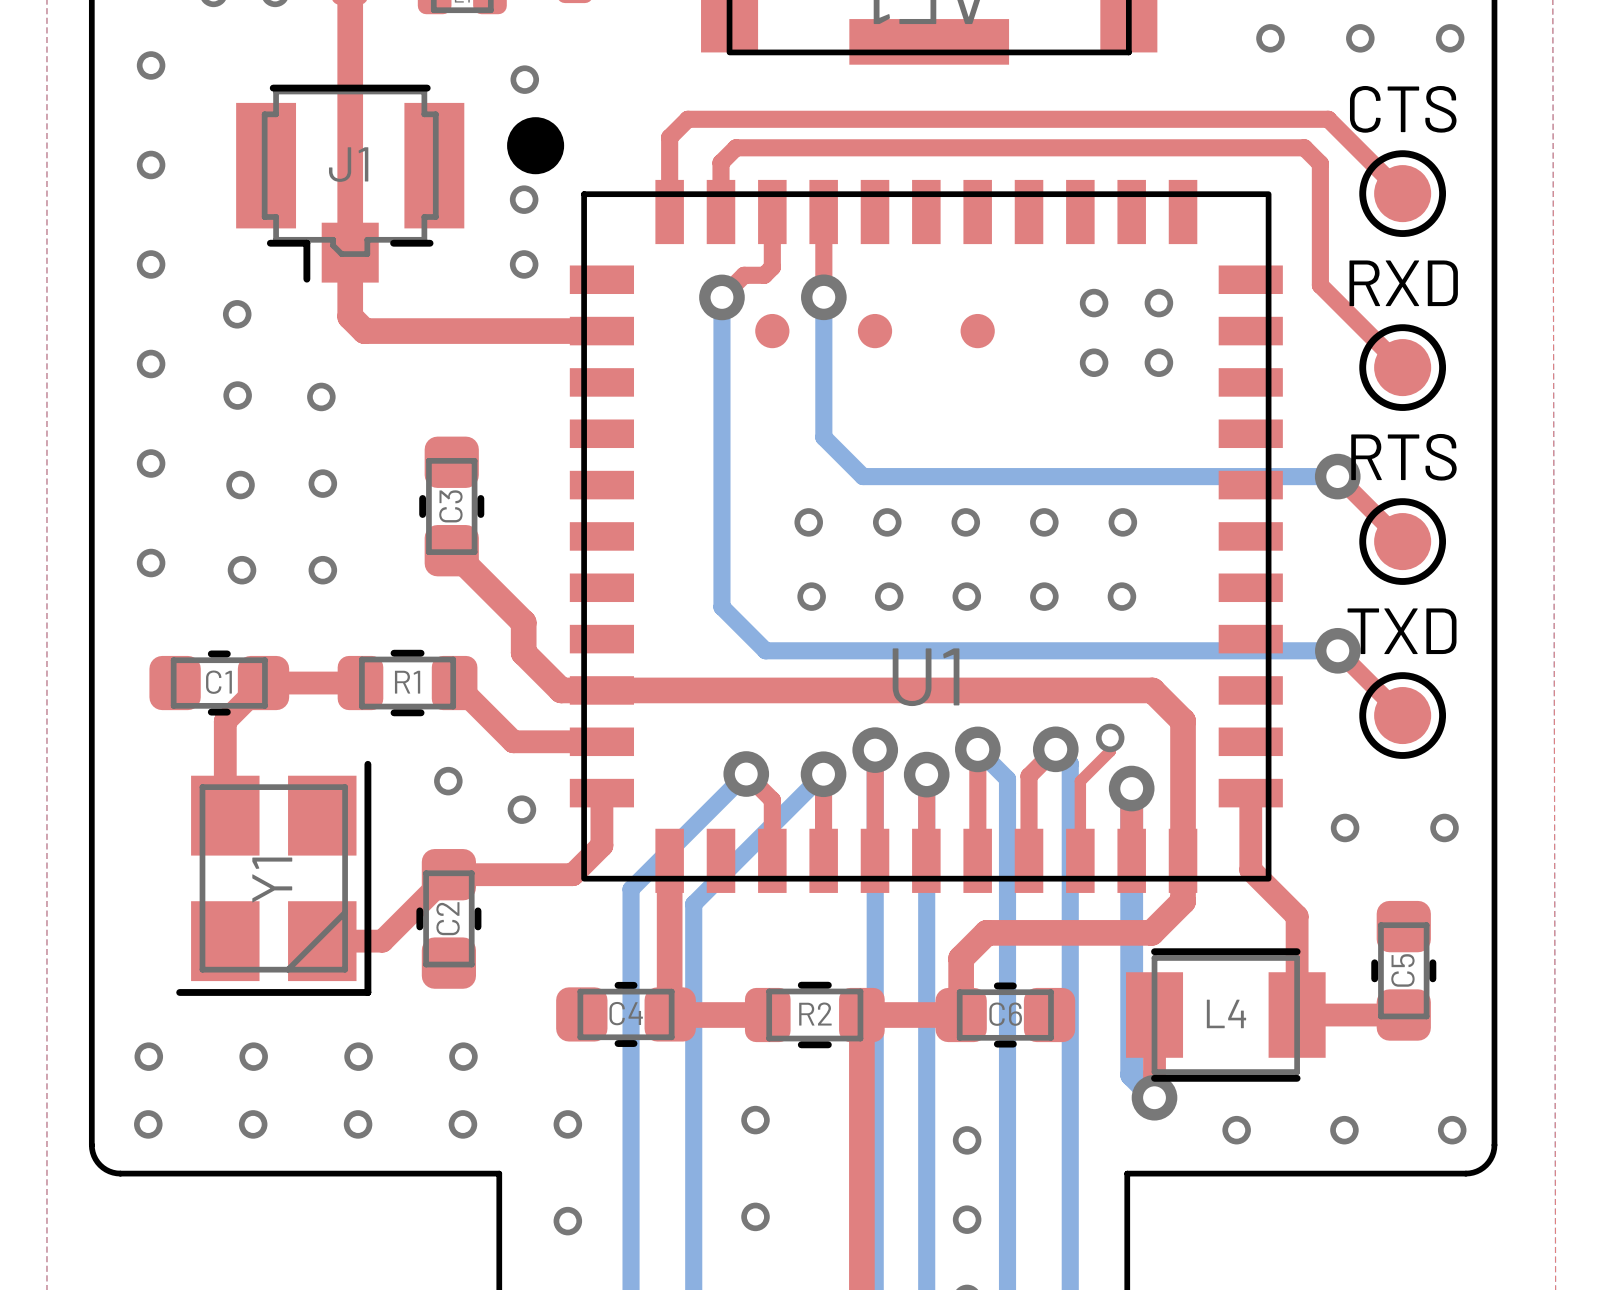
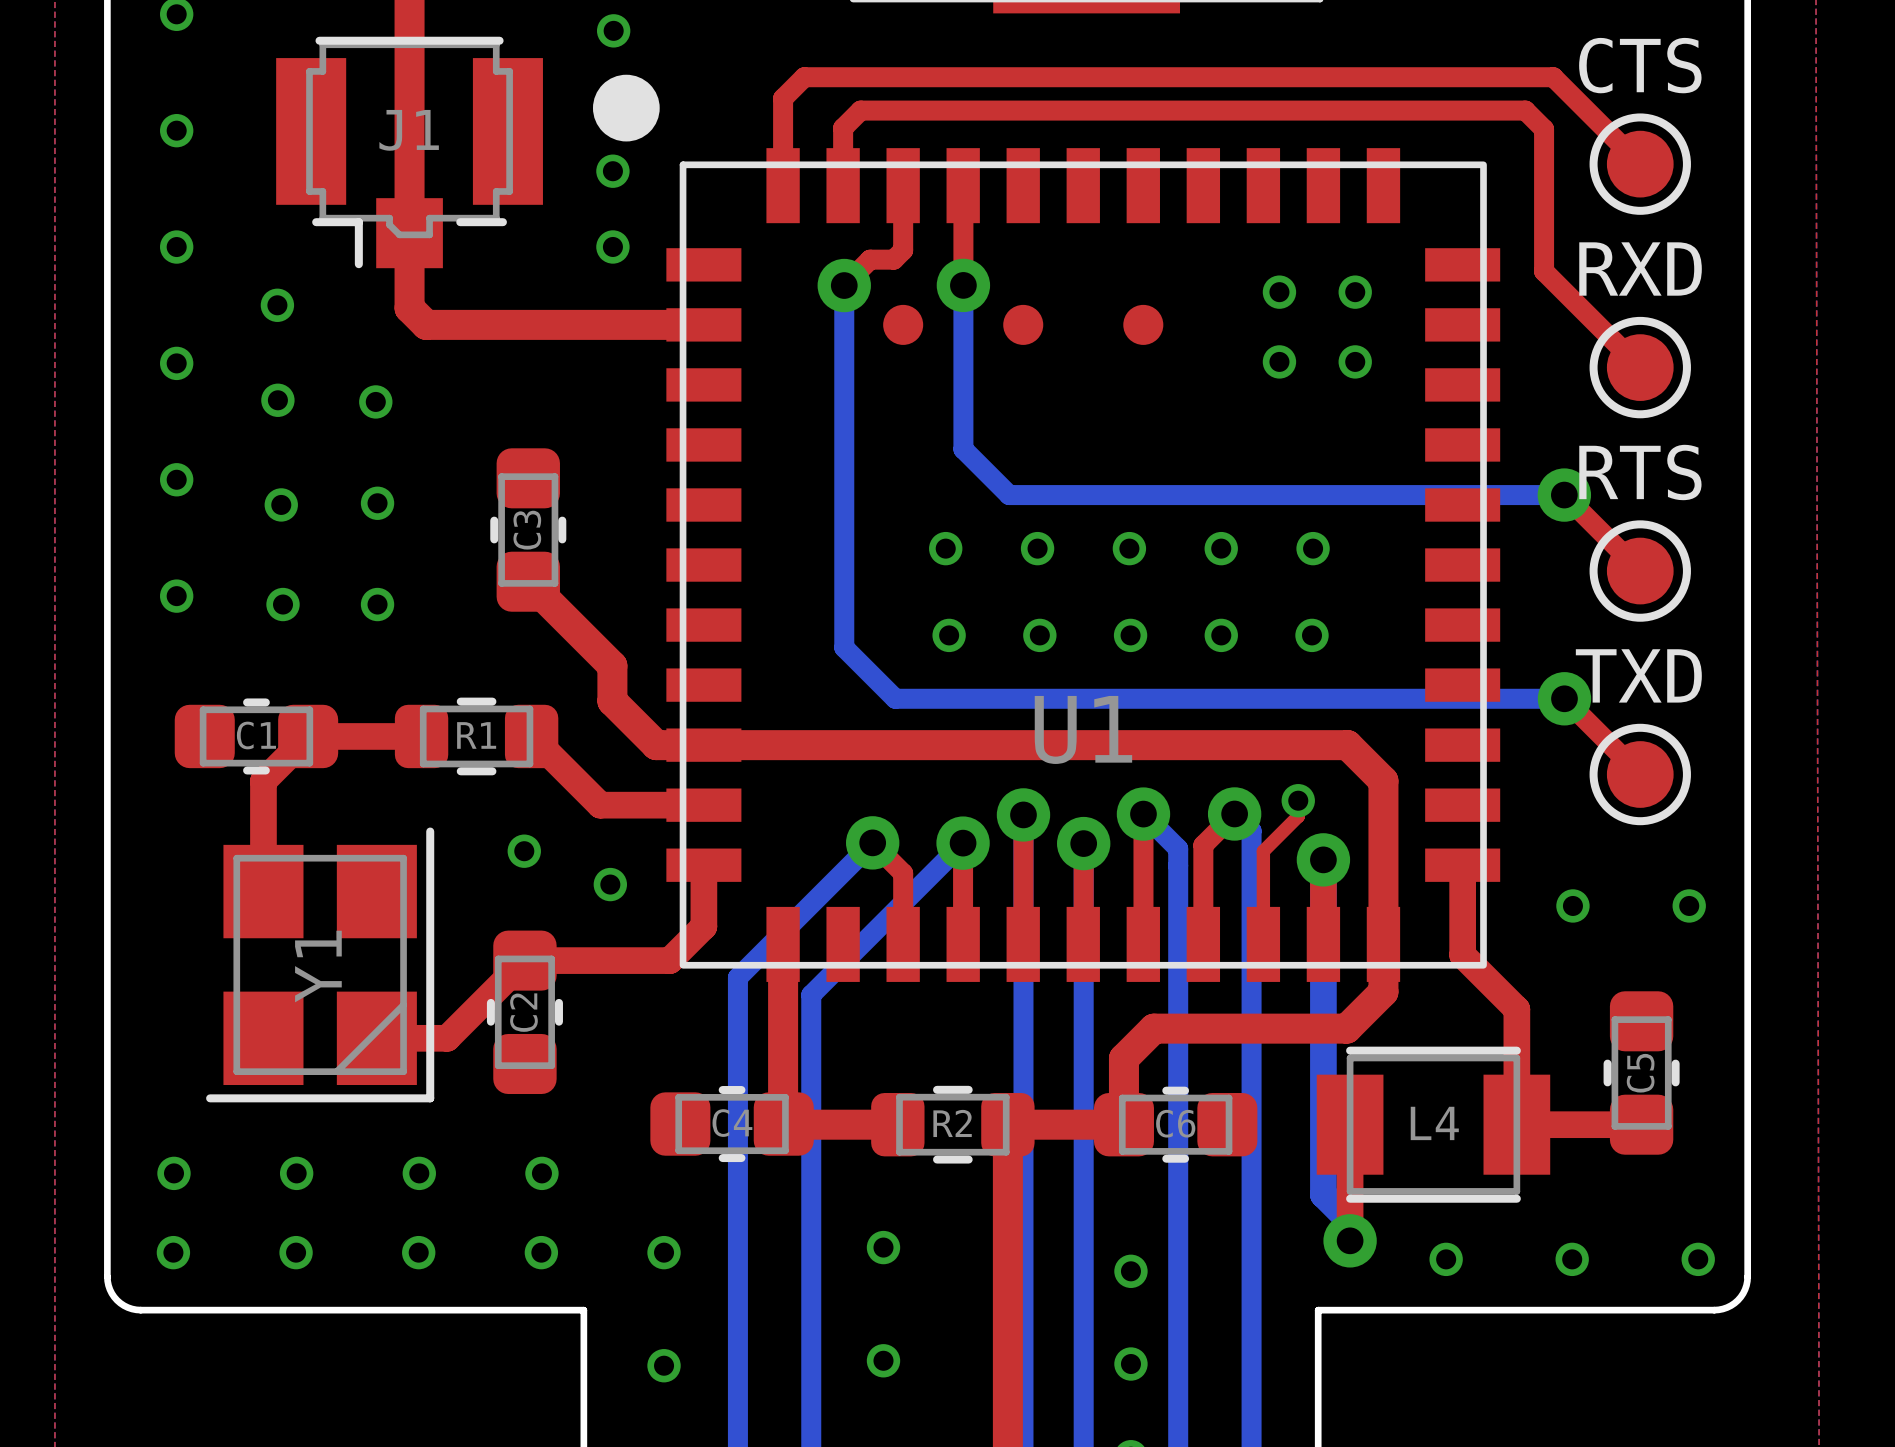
via position: (1154, 1097) -> (1350, 1240)

